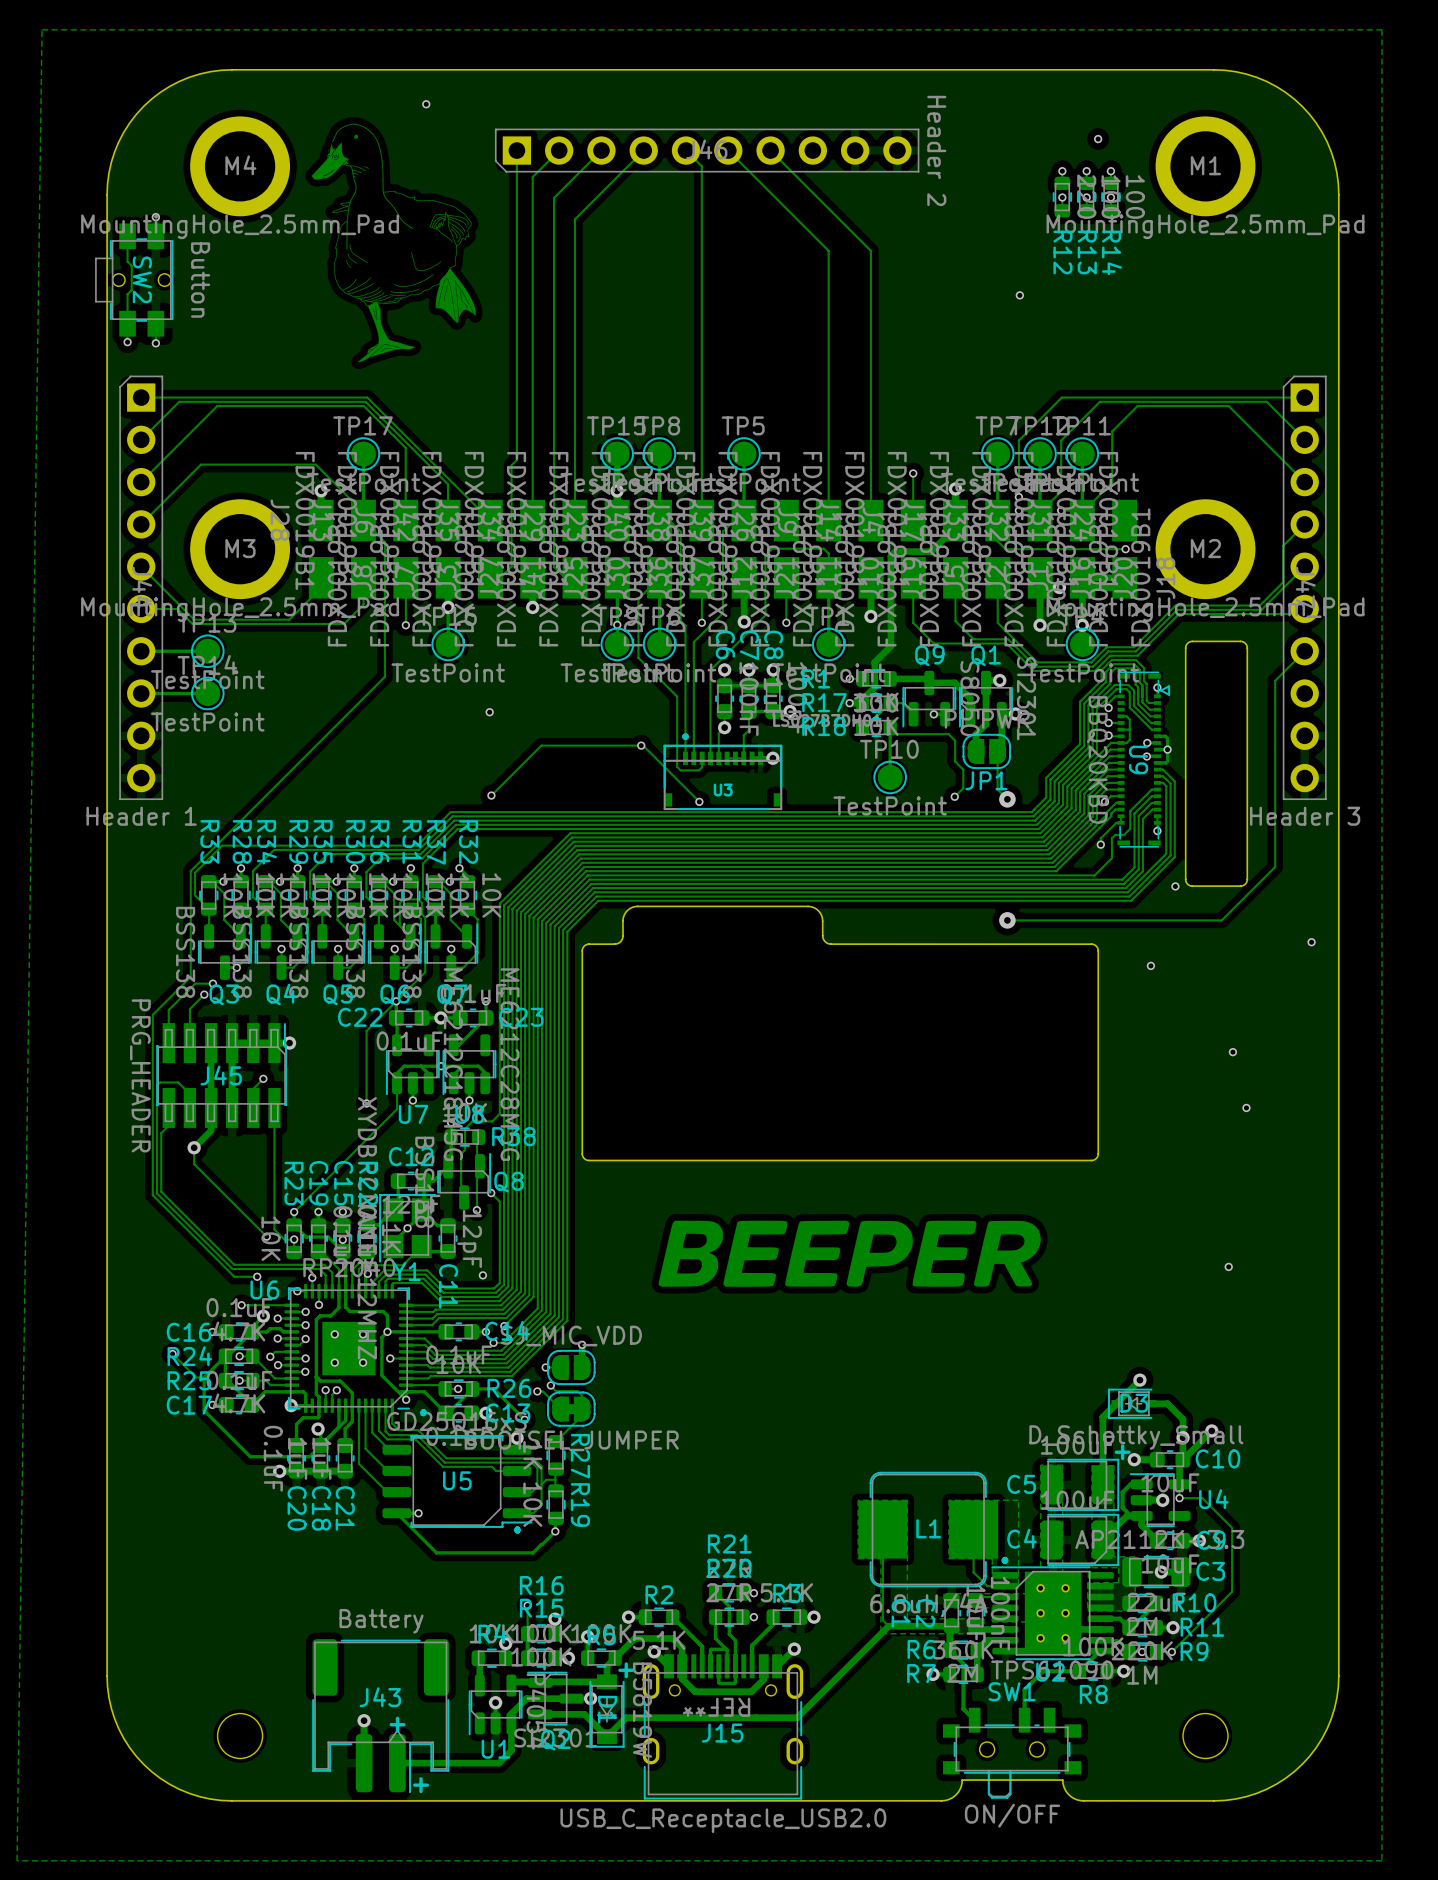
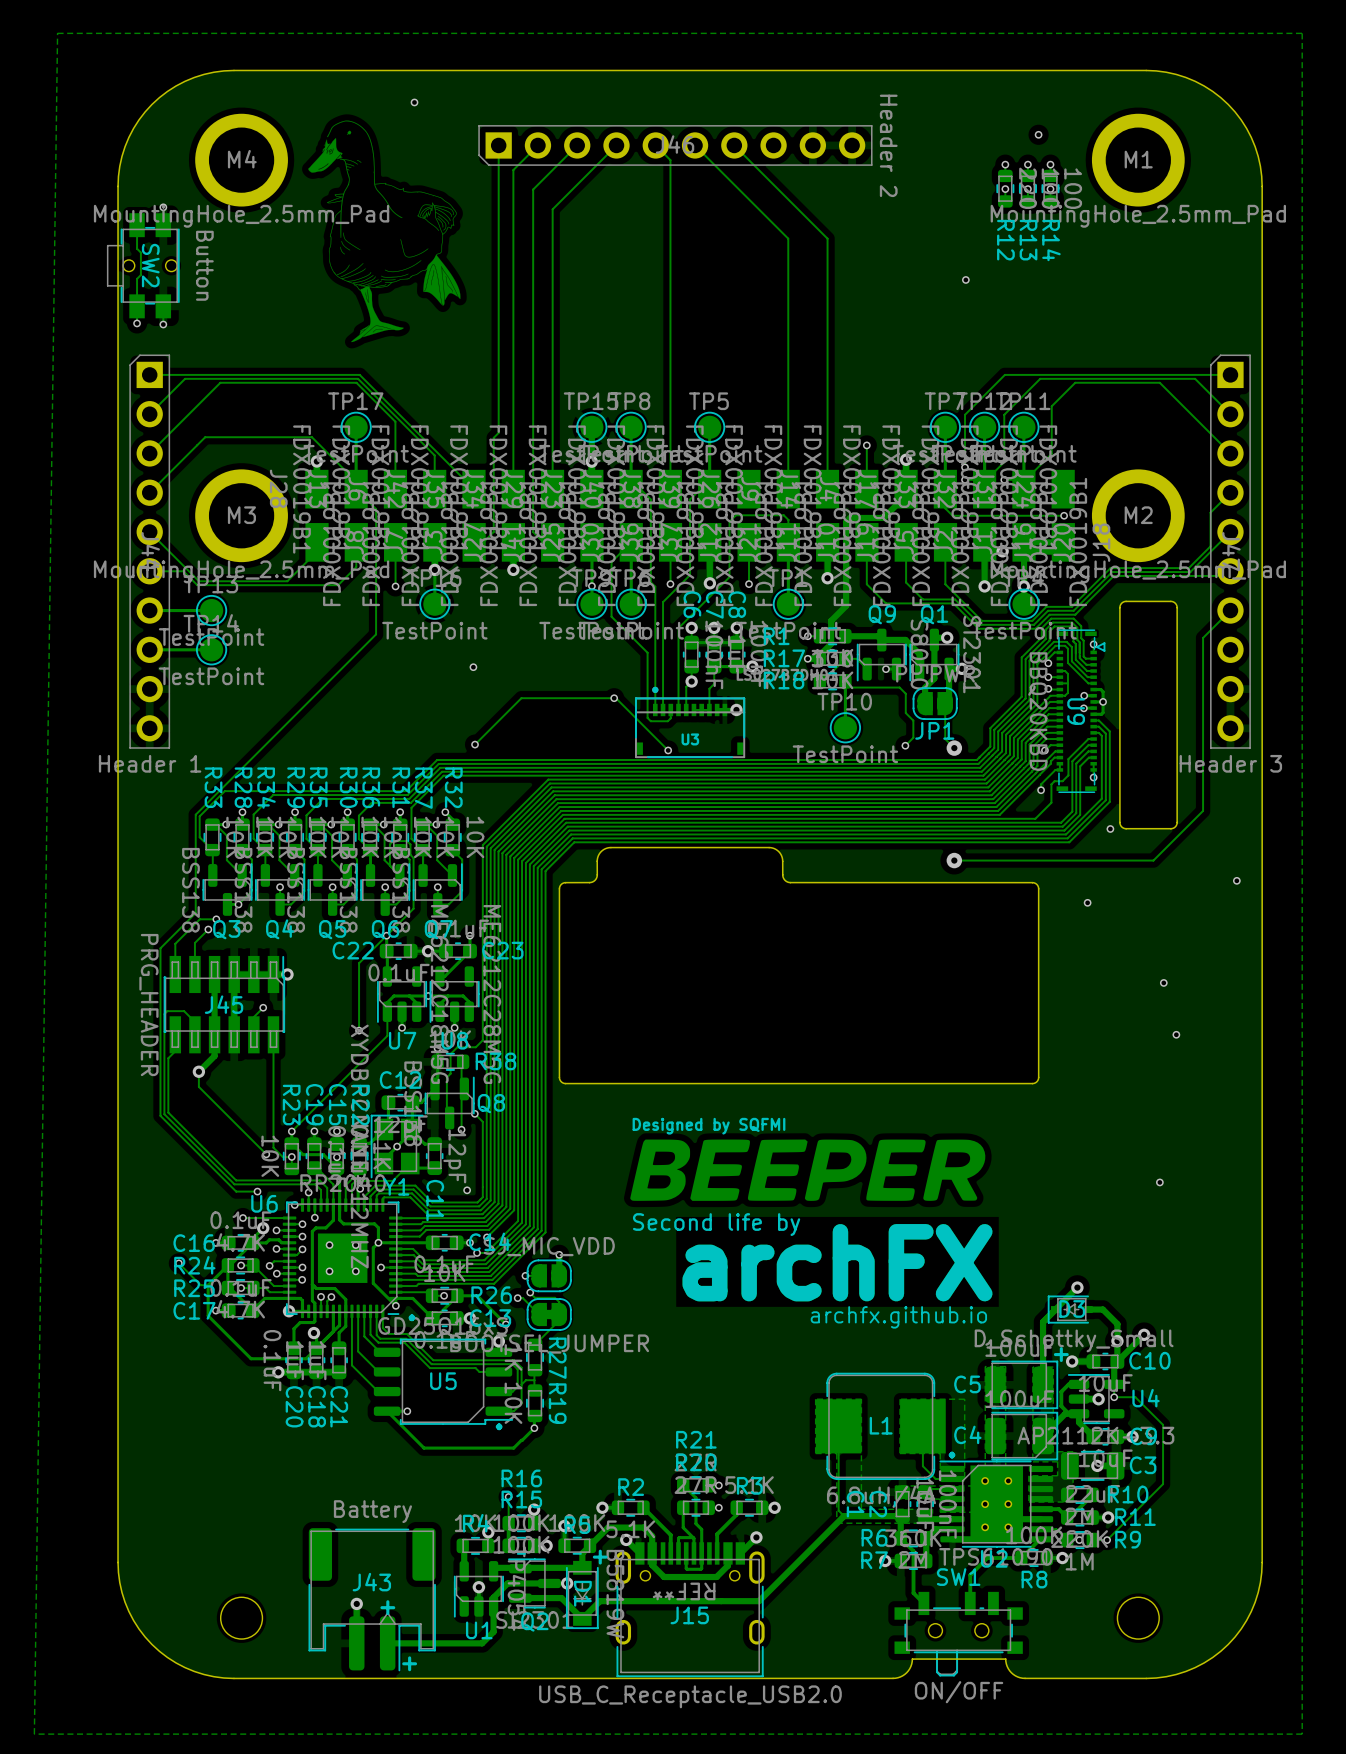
text: none -> Designed by SQFMI (708, 1126)
text: none -> Second life by (716, 1224)
text: none -> archFX (837, 1262)
text: none -> archfx.github.io (898, 1317)

